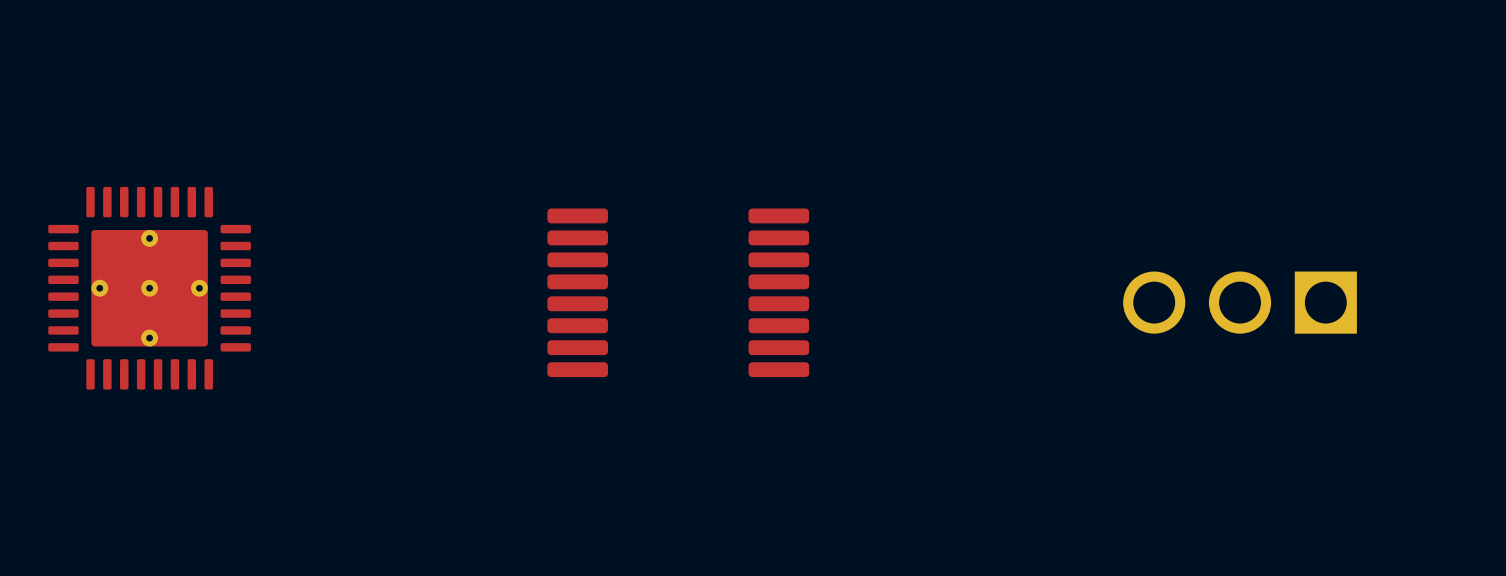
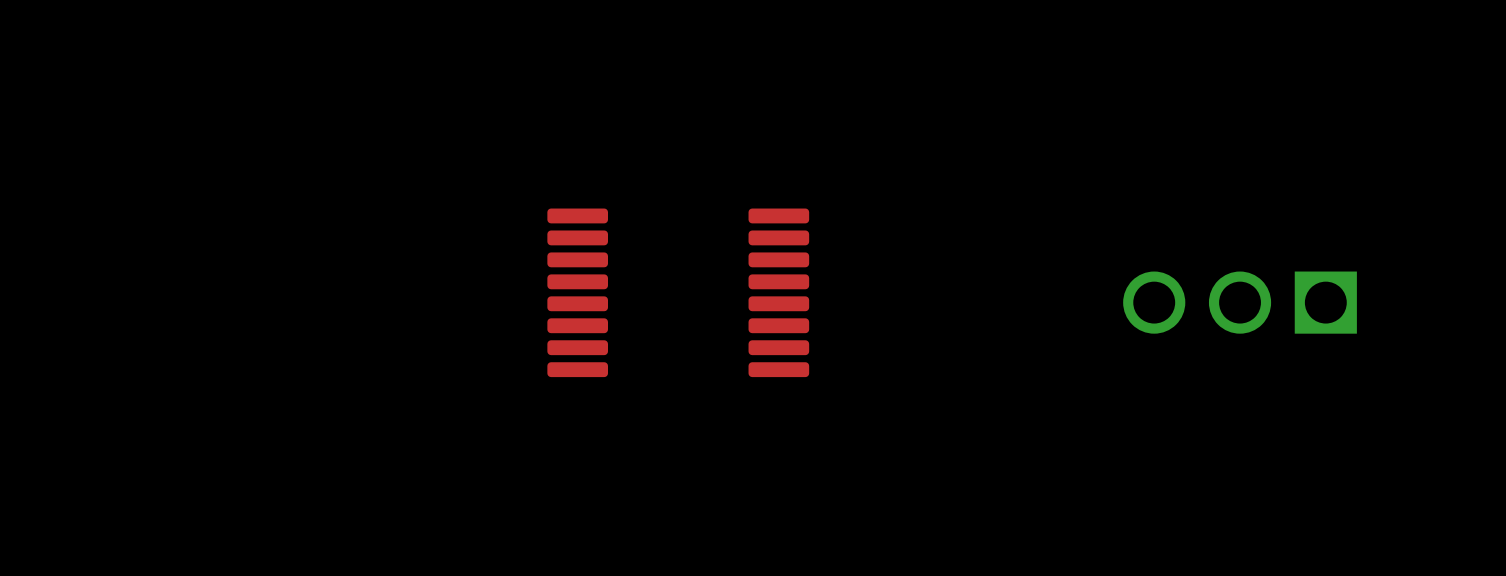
part: (149, 288) -> none

